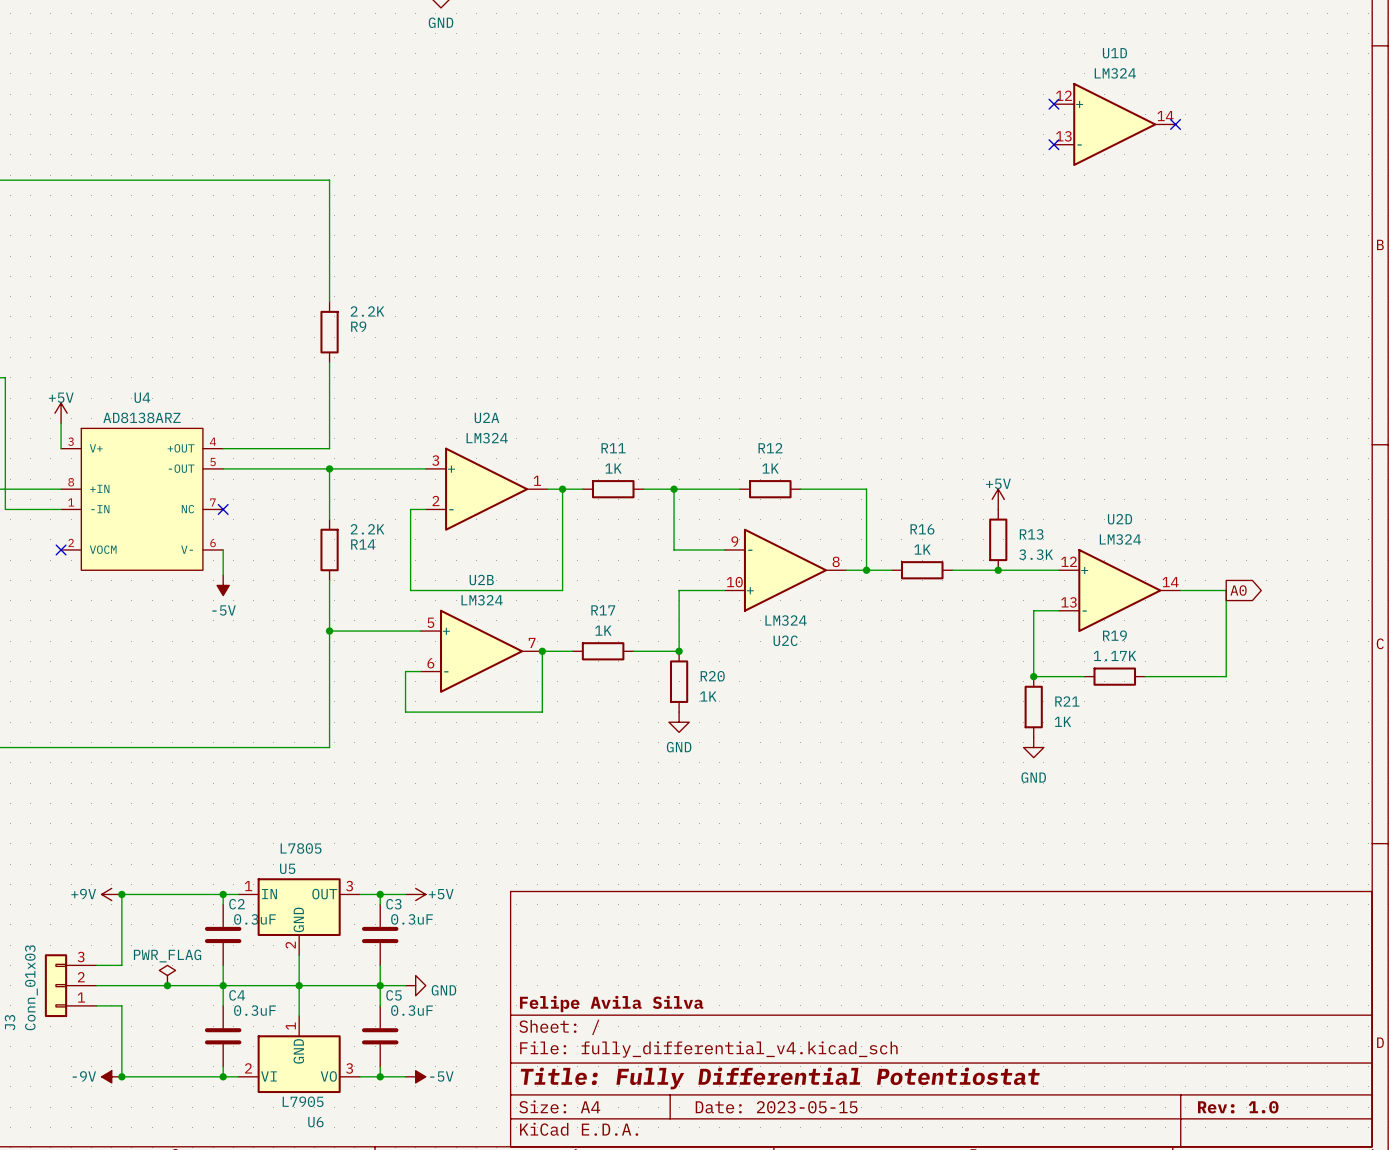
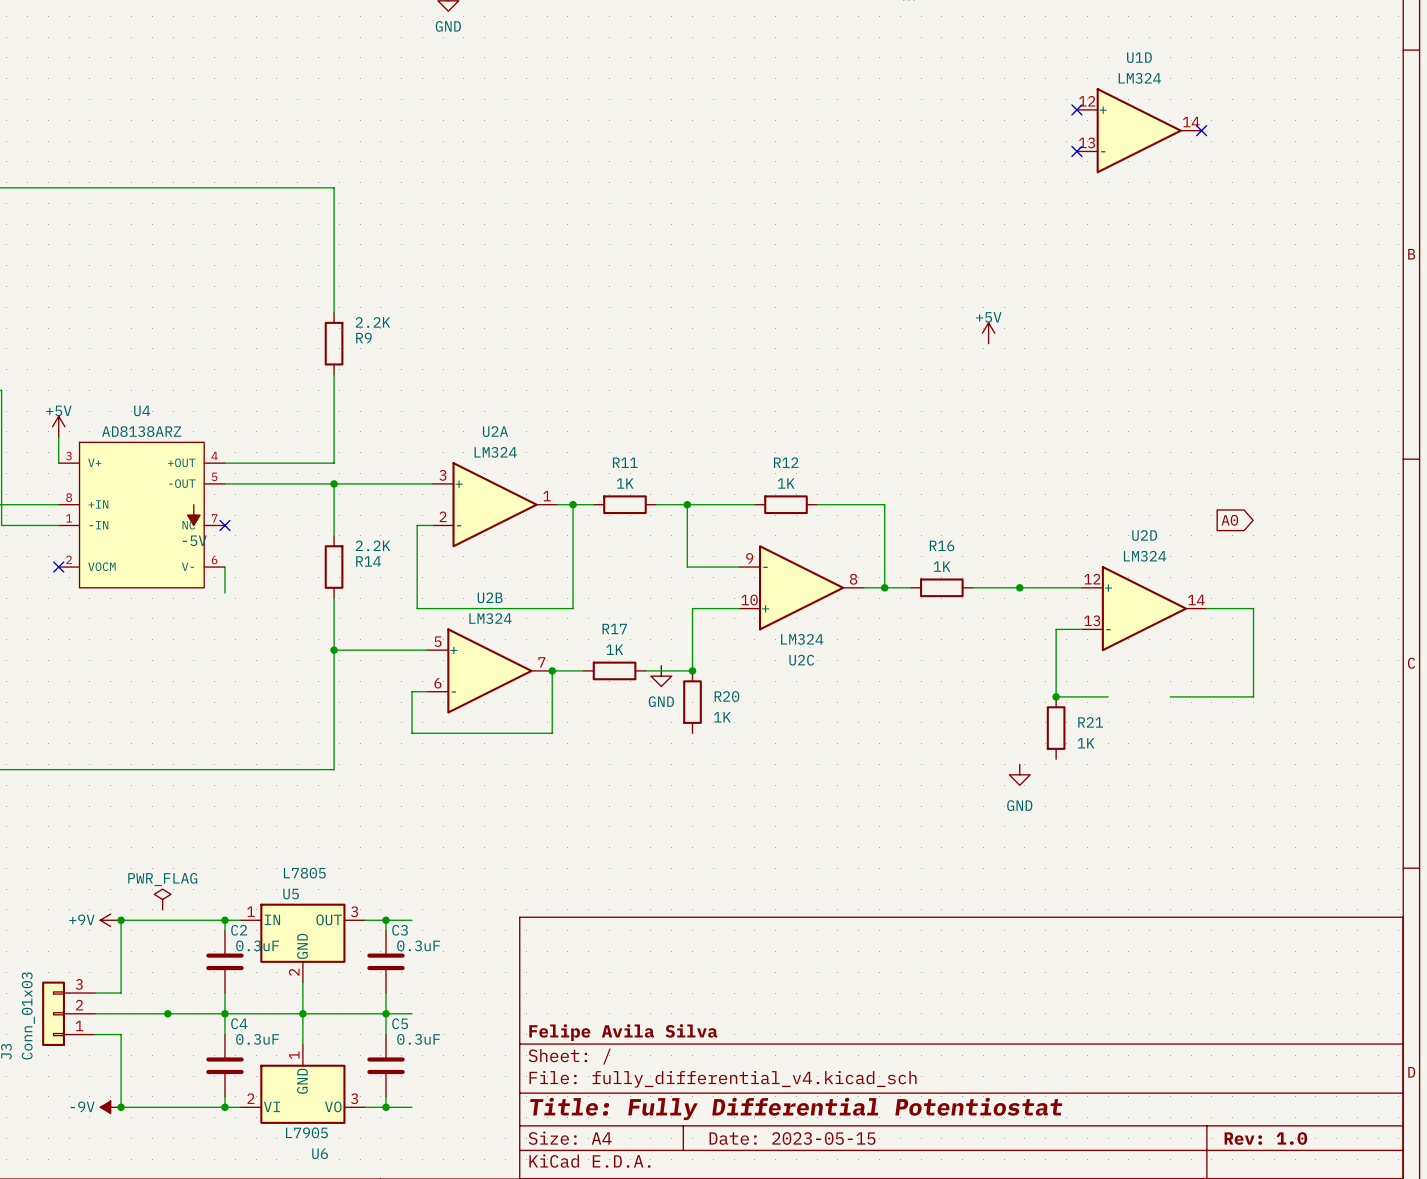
power symbol position: +5V (998, 499) -> +5V (988, 333)
R13: 3.3K (998, 539) -> none
power symbol position: -5V (223, 585) -> -5V (193, 515)
global label position: A0 (1238, 590) -> A0 (1229, 520)
R19: 1.17K (1114, 676) -> none
power symbol position: GND (679, 722) -> GND (661, 676)
power symbol position: GND (1033, 747) -> GND (1019, 774)
power symbol: +5V (415, 894) -> none
power symbol position: PWR_FLAG (167, 975) -> PWR_FLAG (162, 899)
power symbol: GND (415, 985) -> none
power symbol: -5V (415, 1076) -> none

